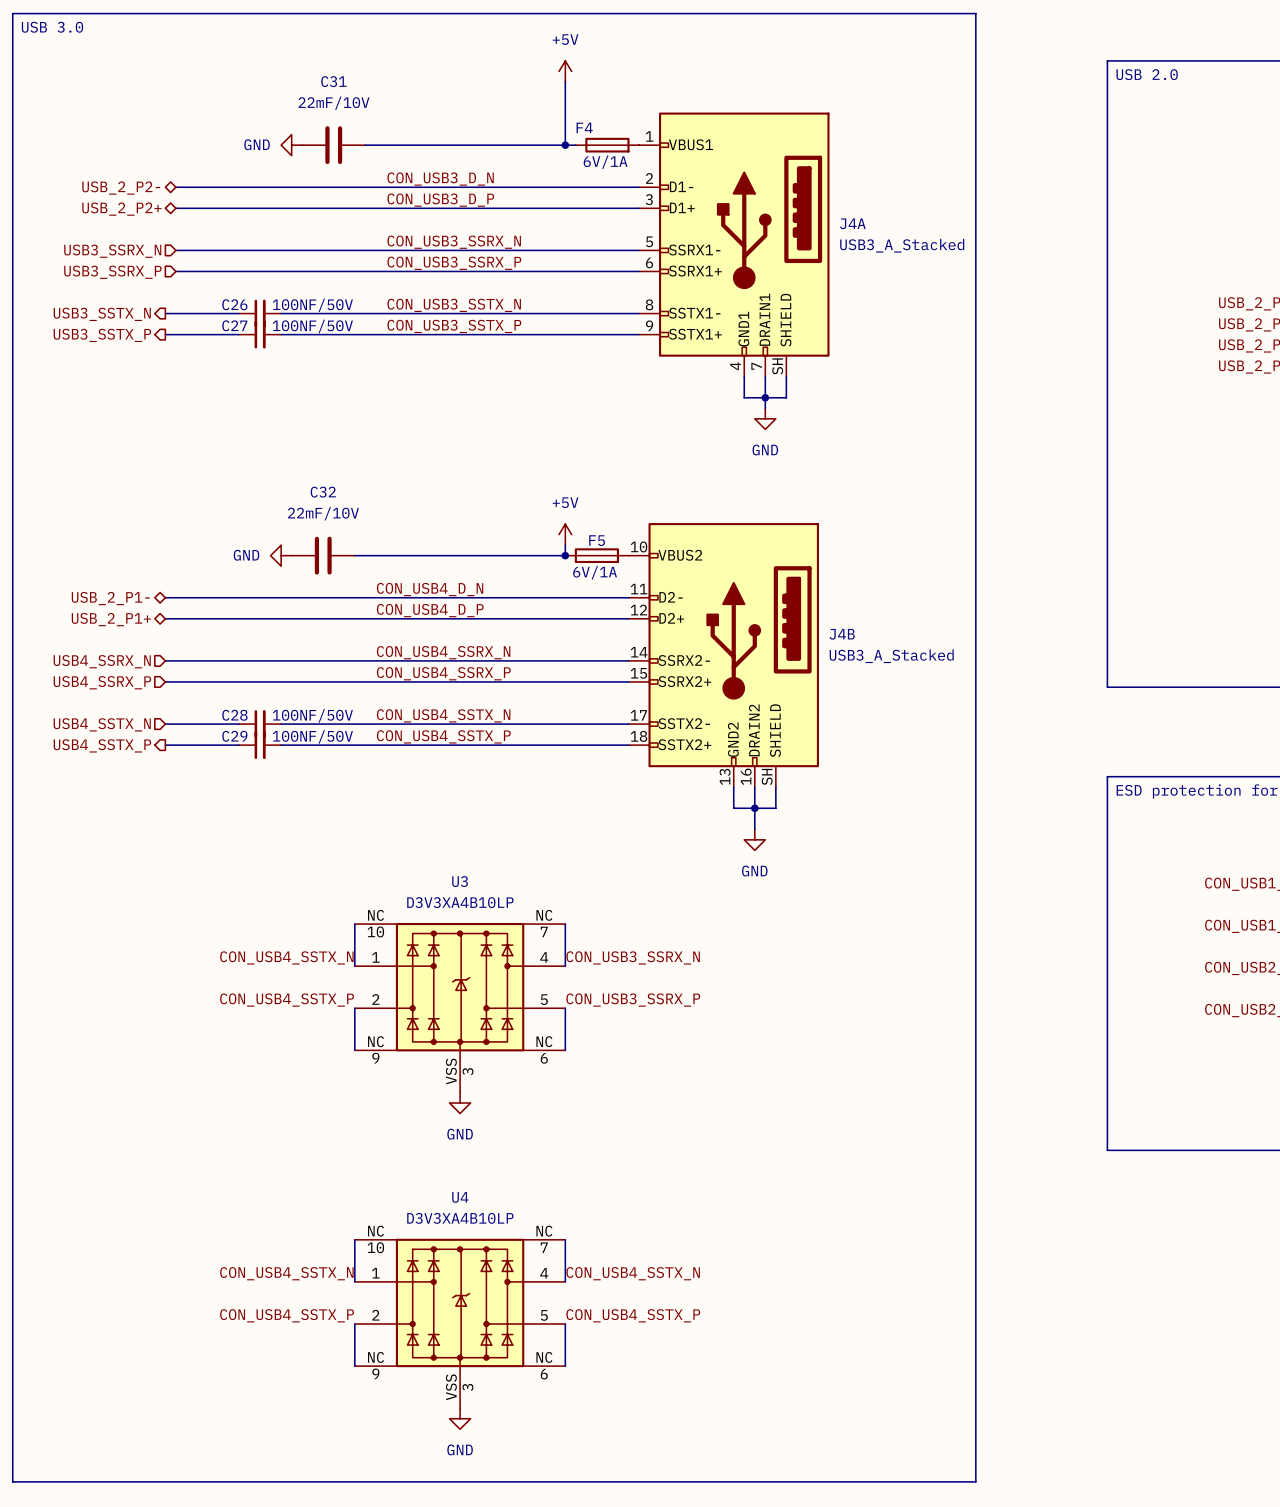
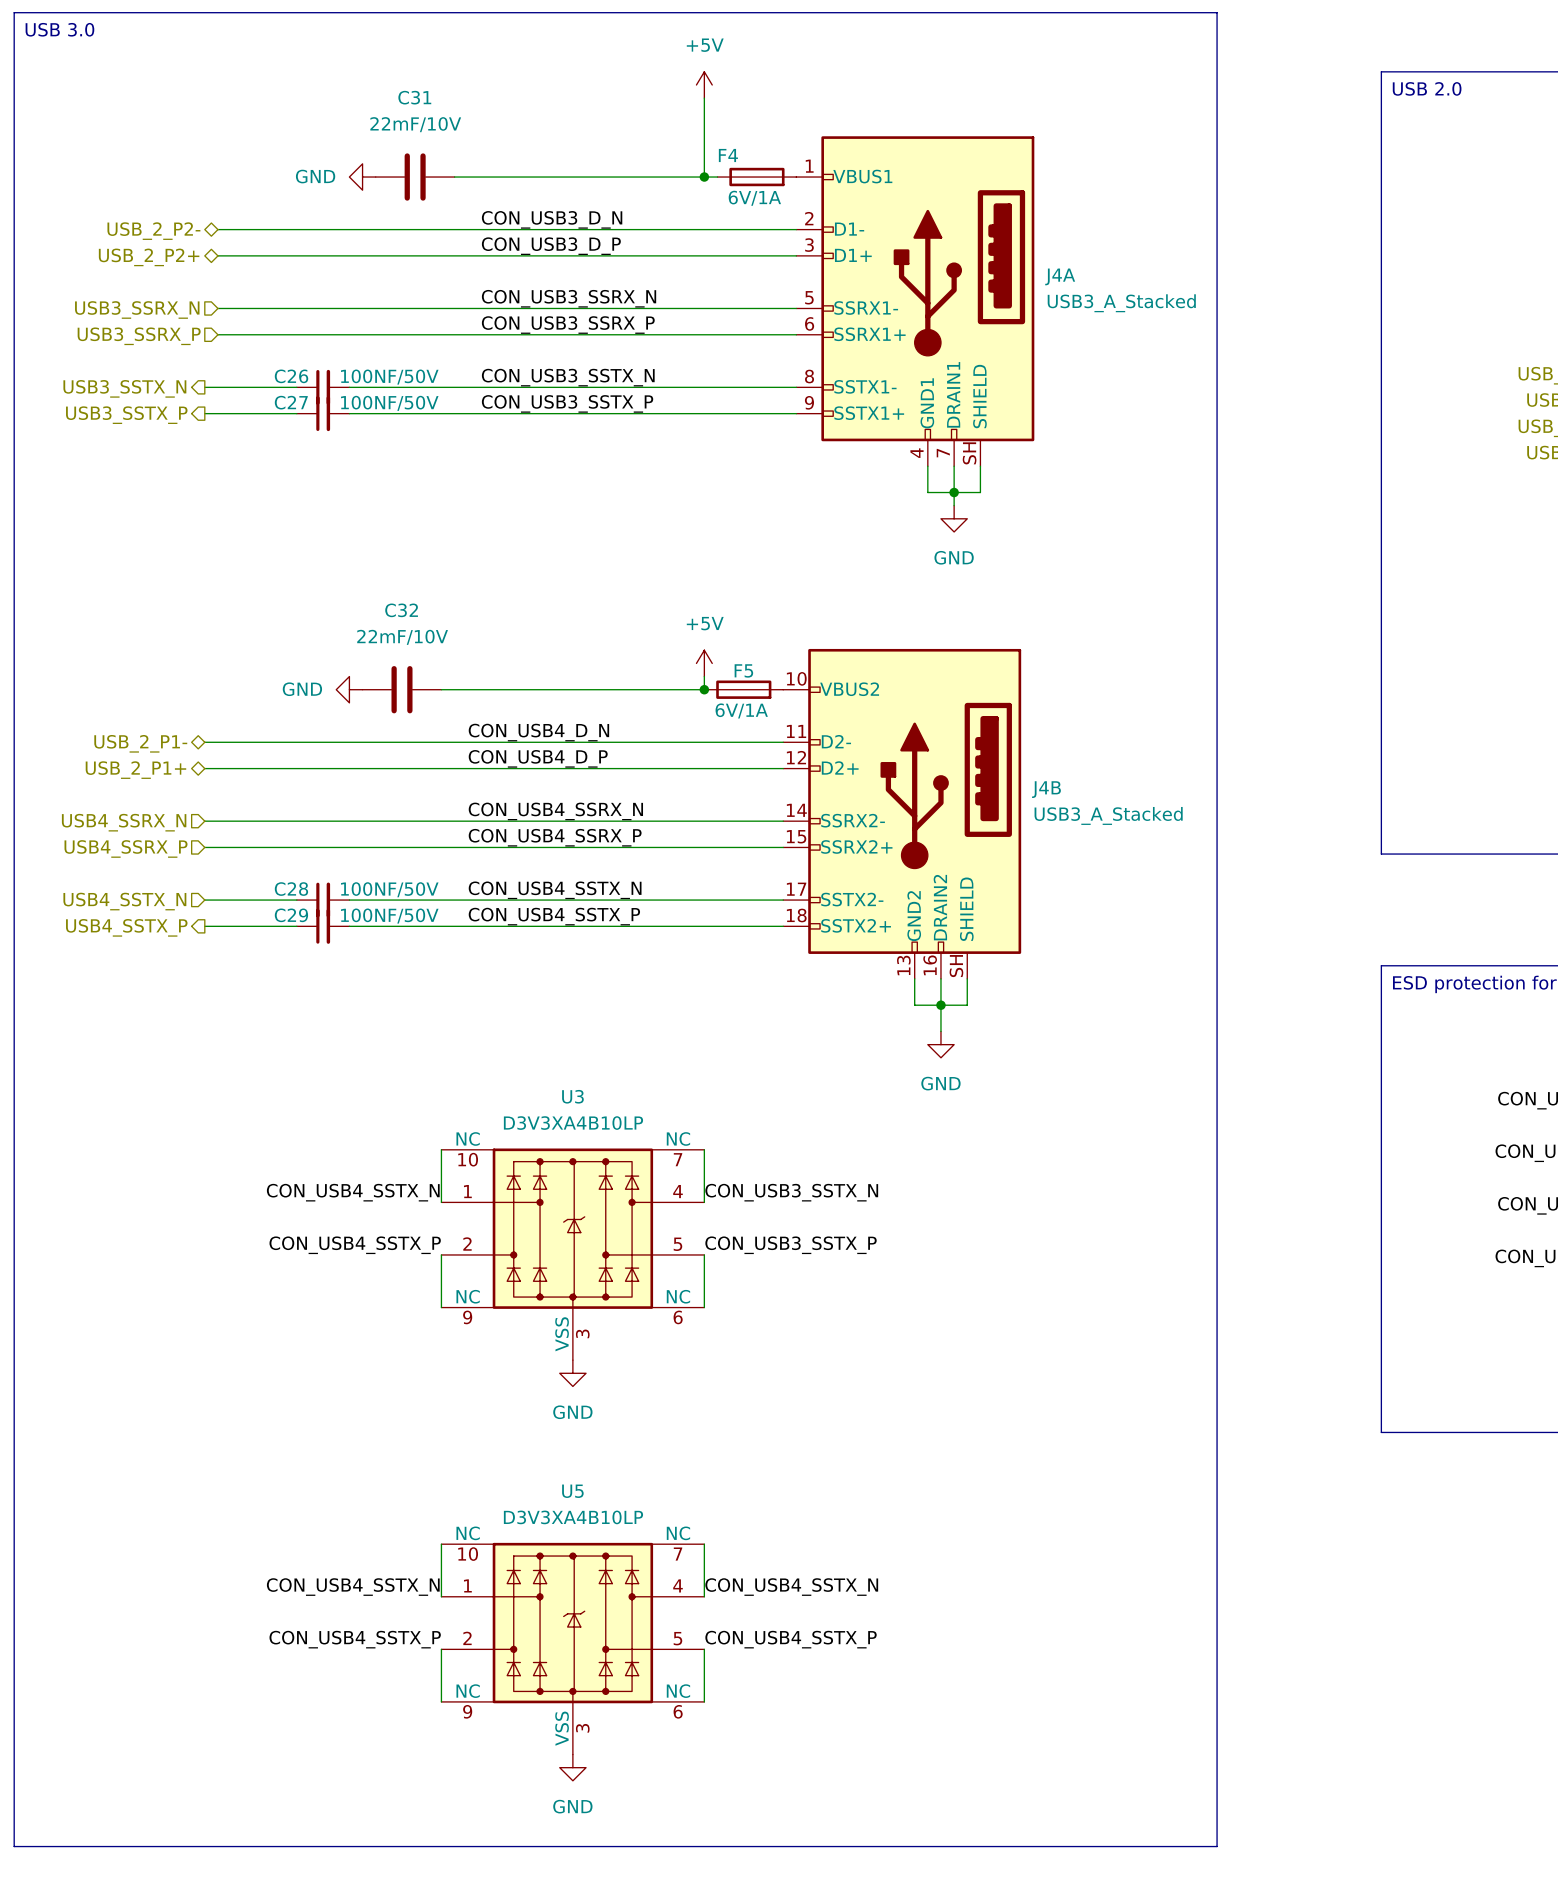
label: CON_USB3_SSRX_N (633, 957) -> CON_USB3_SSTX_N (791, 1192)
label: CON_USB3_SSRX_P (633, 1000) -> CON_USB3_SSTX_P (791, 1245)
U4 name: U4 (460, 1197) -> U5 (572, 1491)

